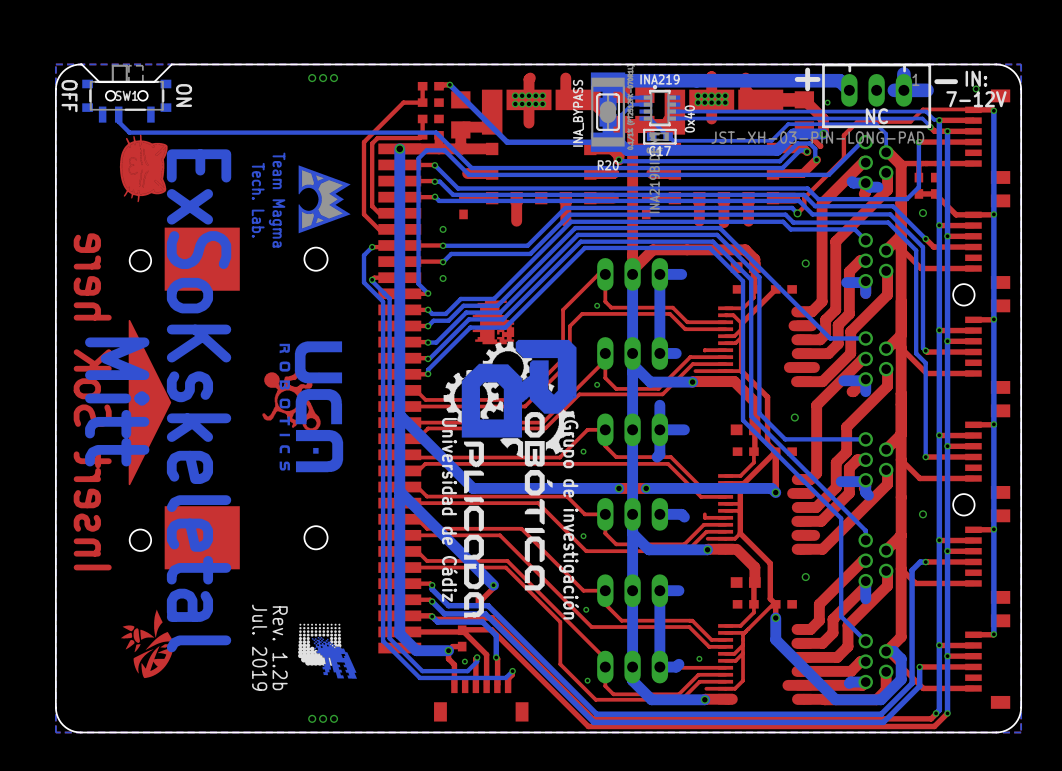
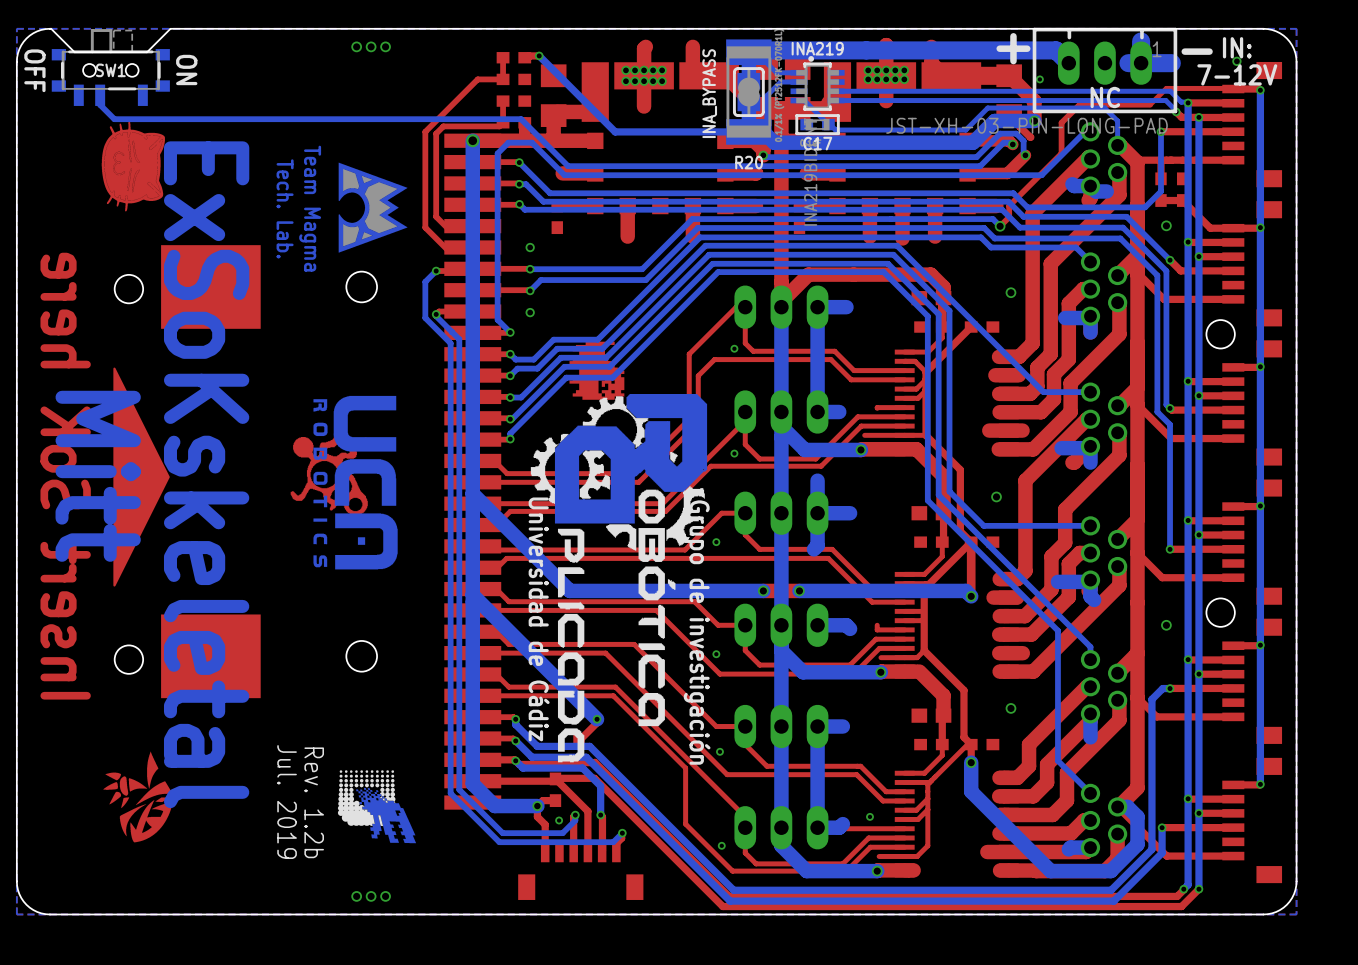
text: 0x40 (689, 118) -> none

